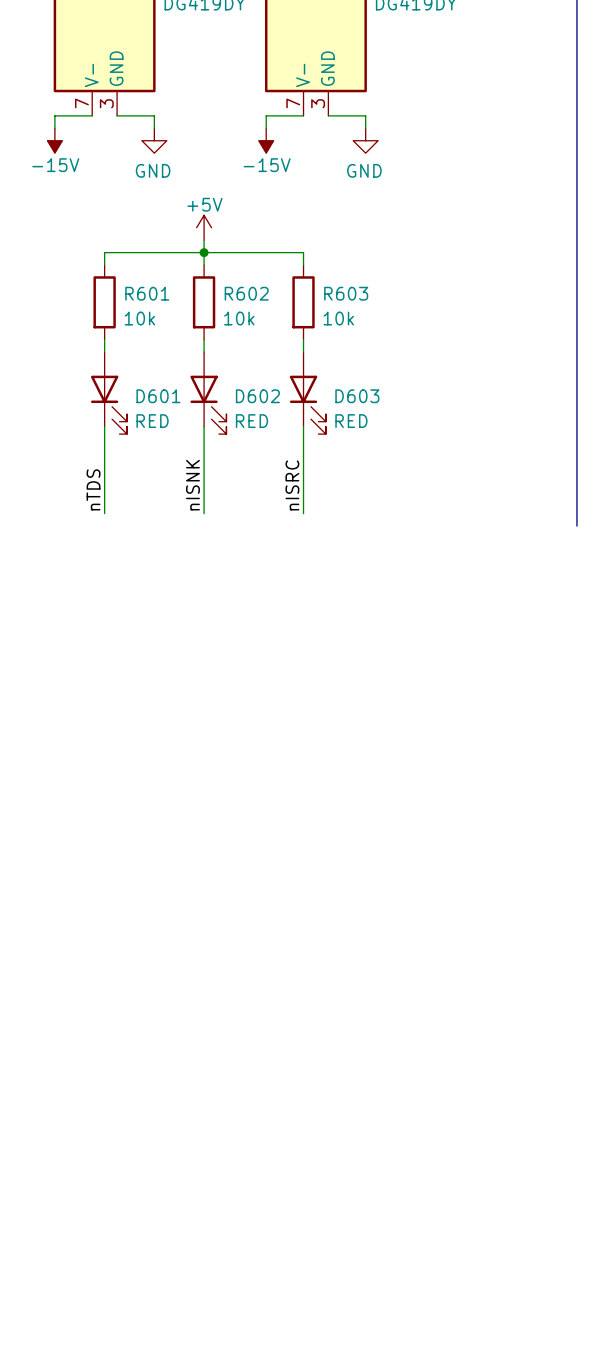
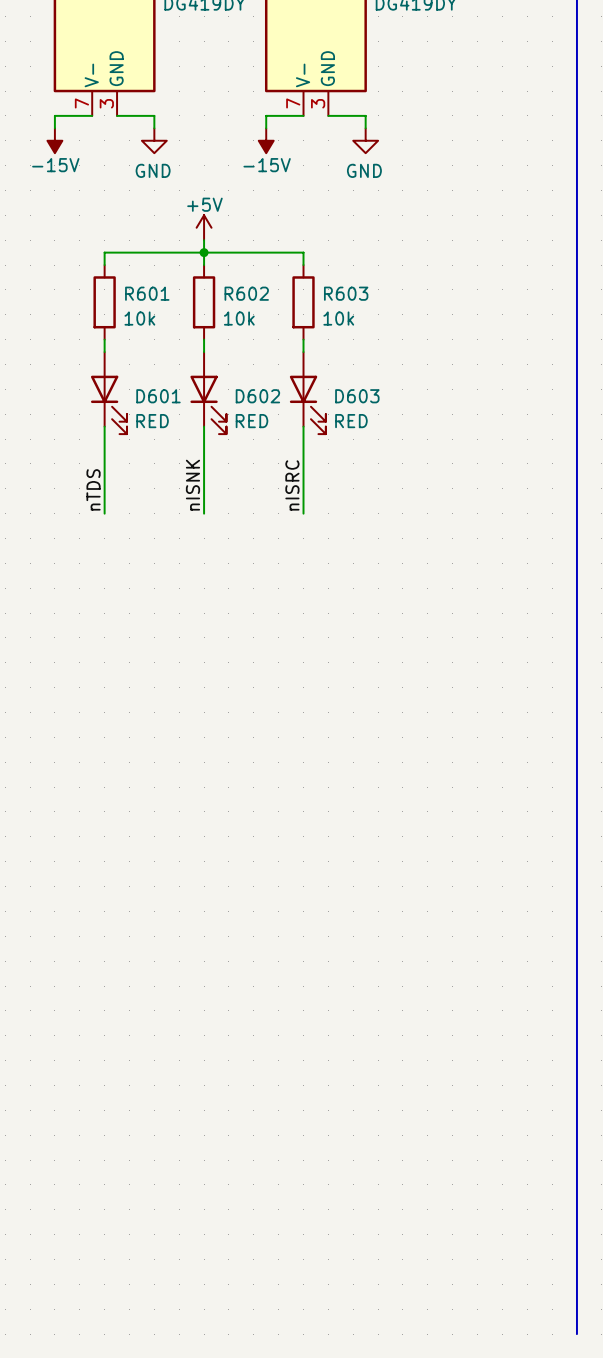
line: none -> (576, 526) (576, 1334)

